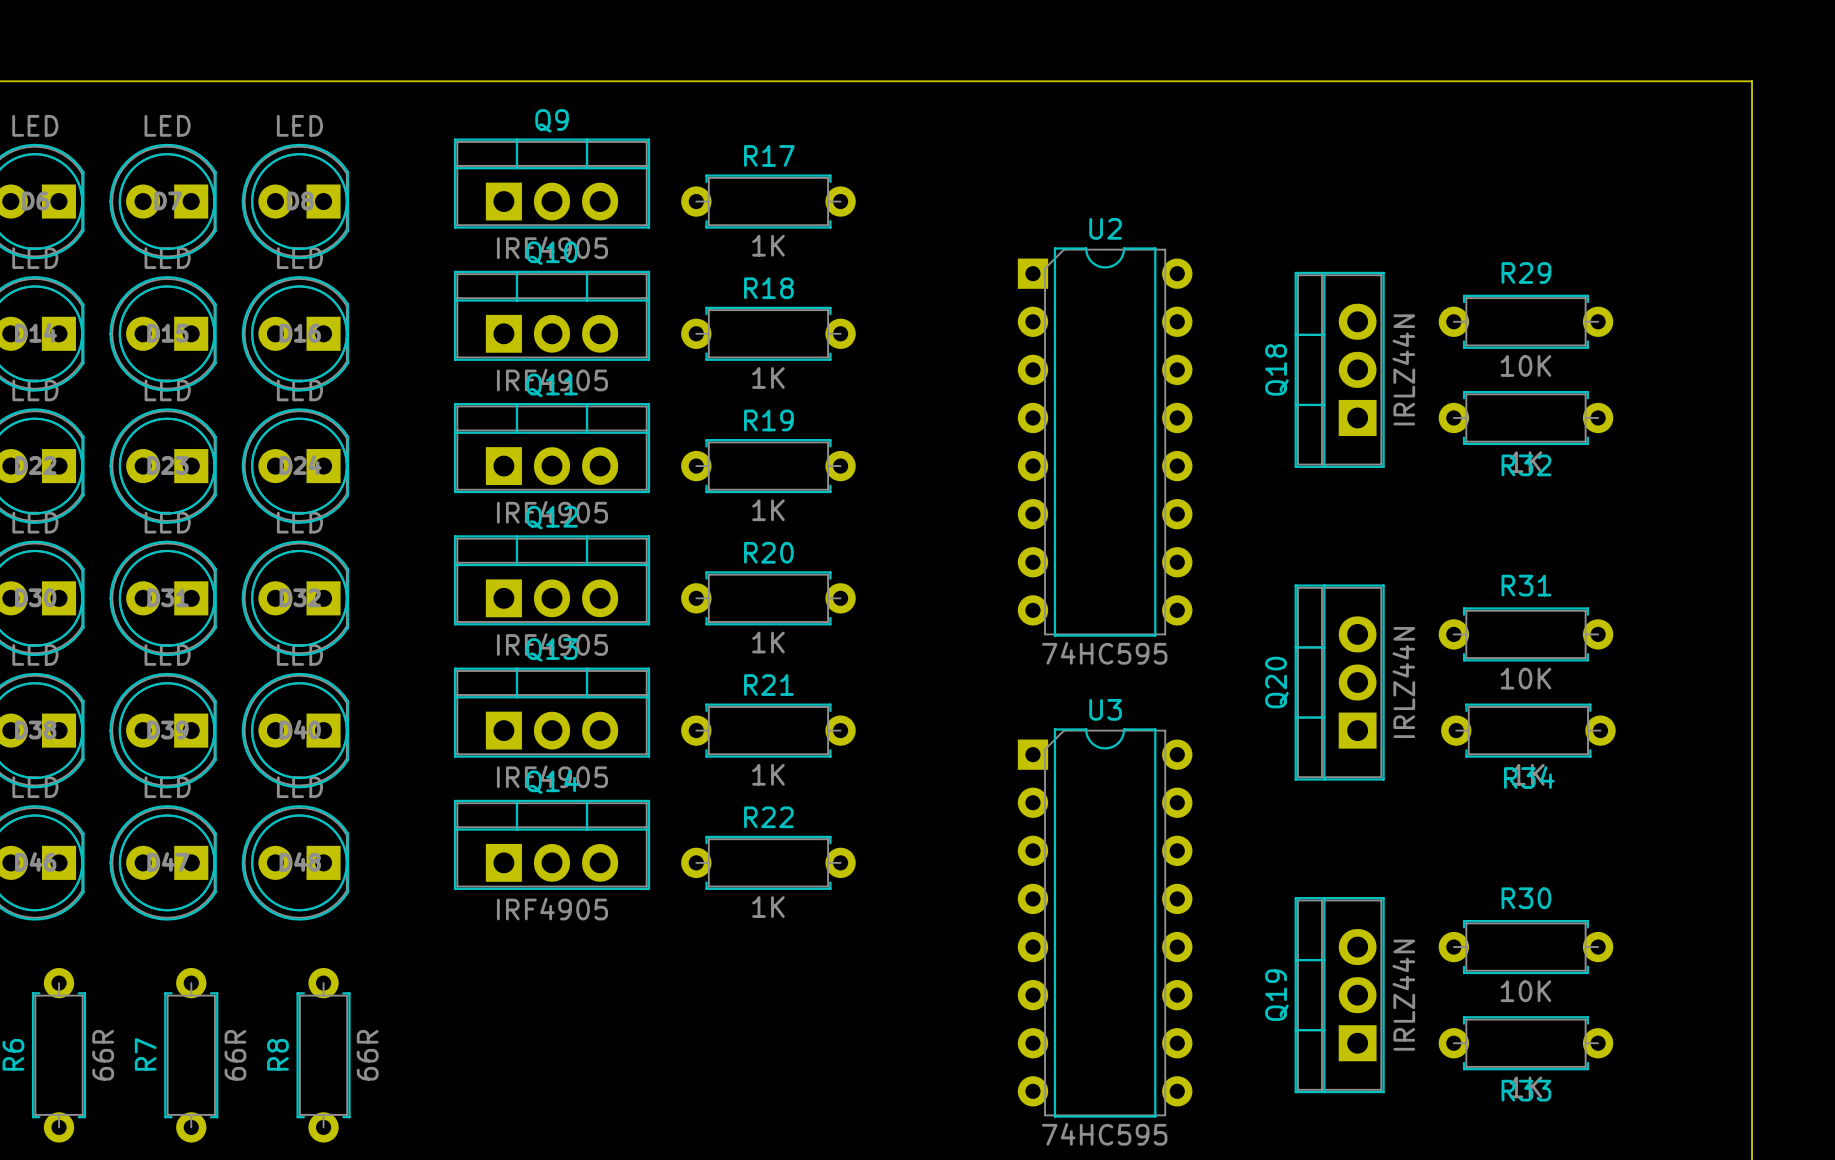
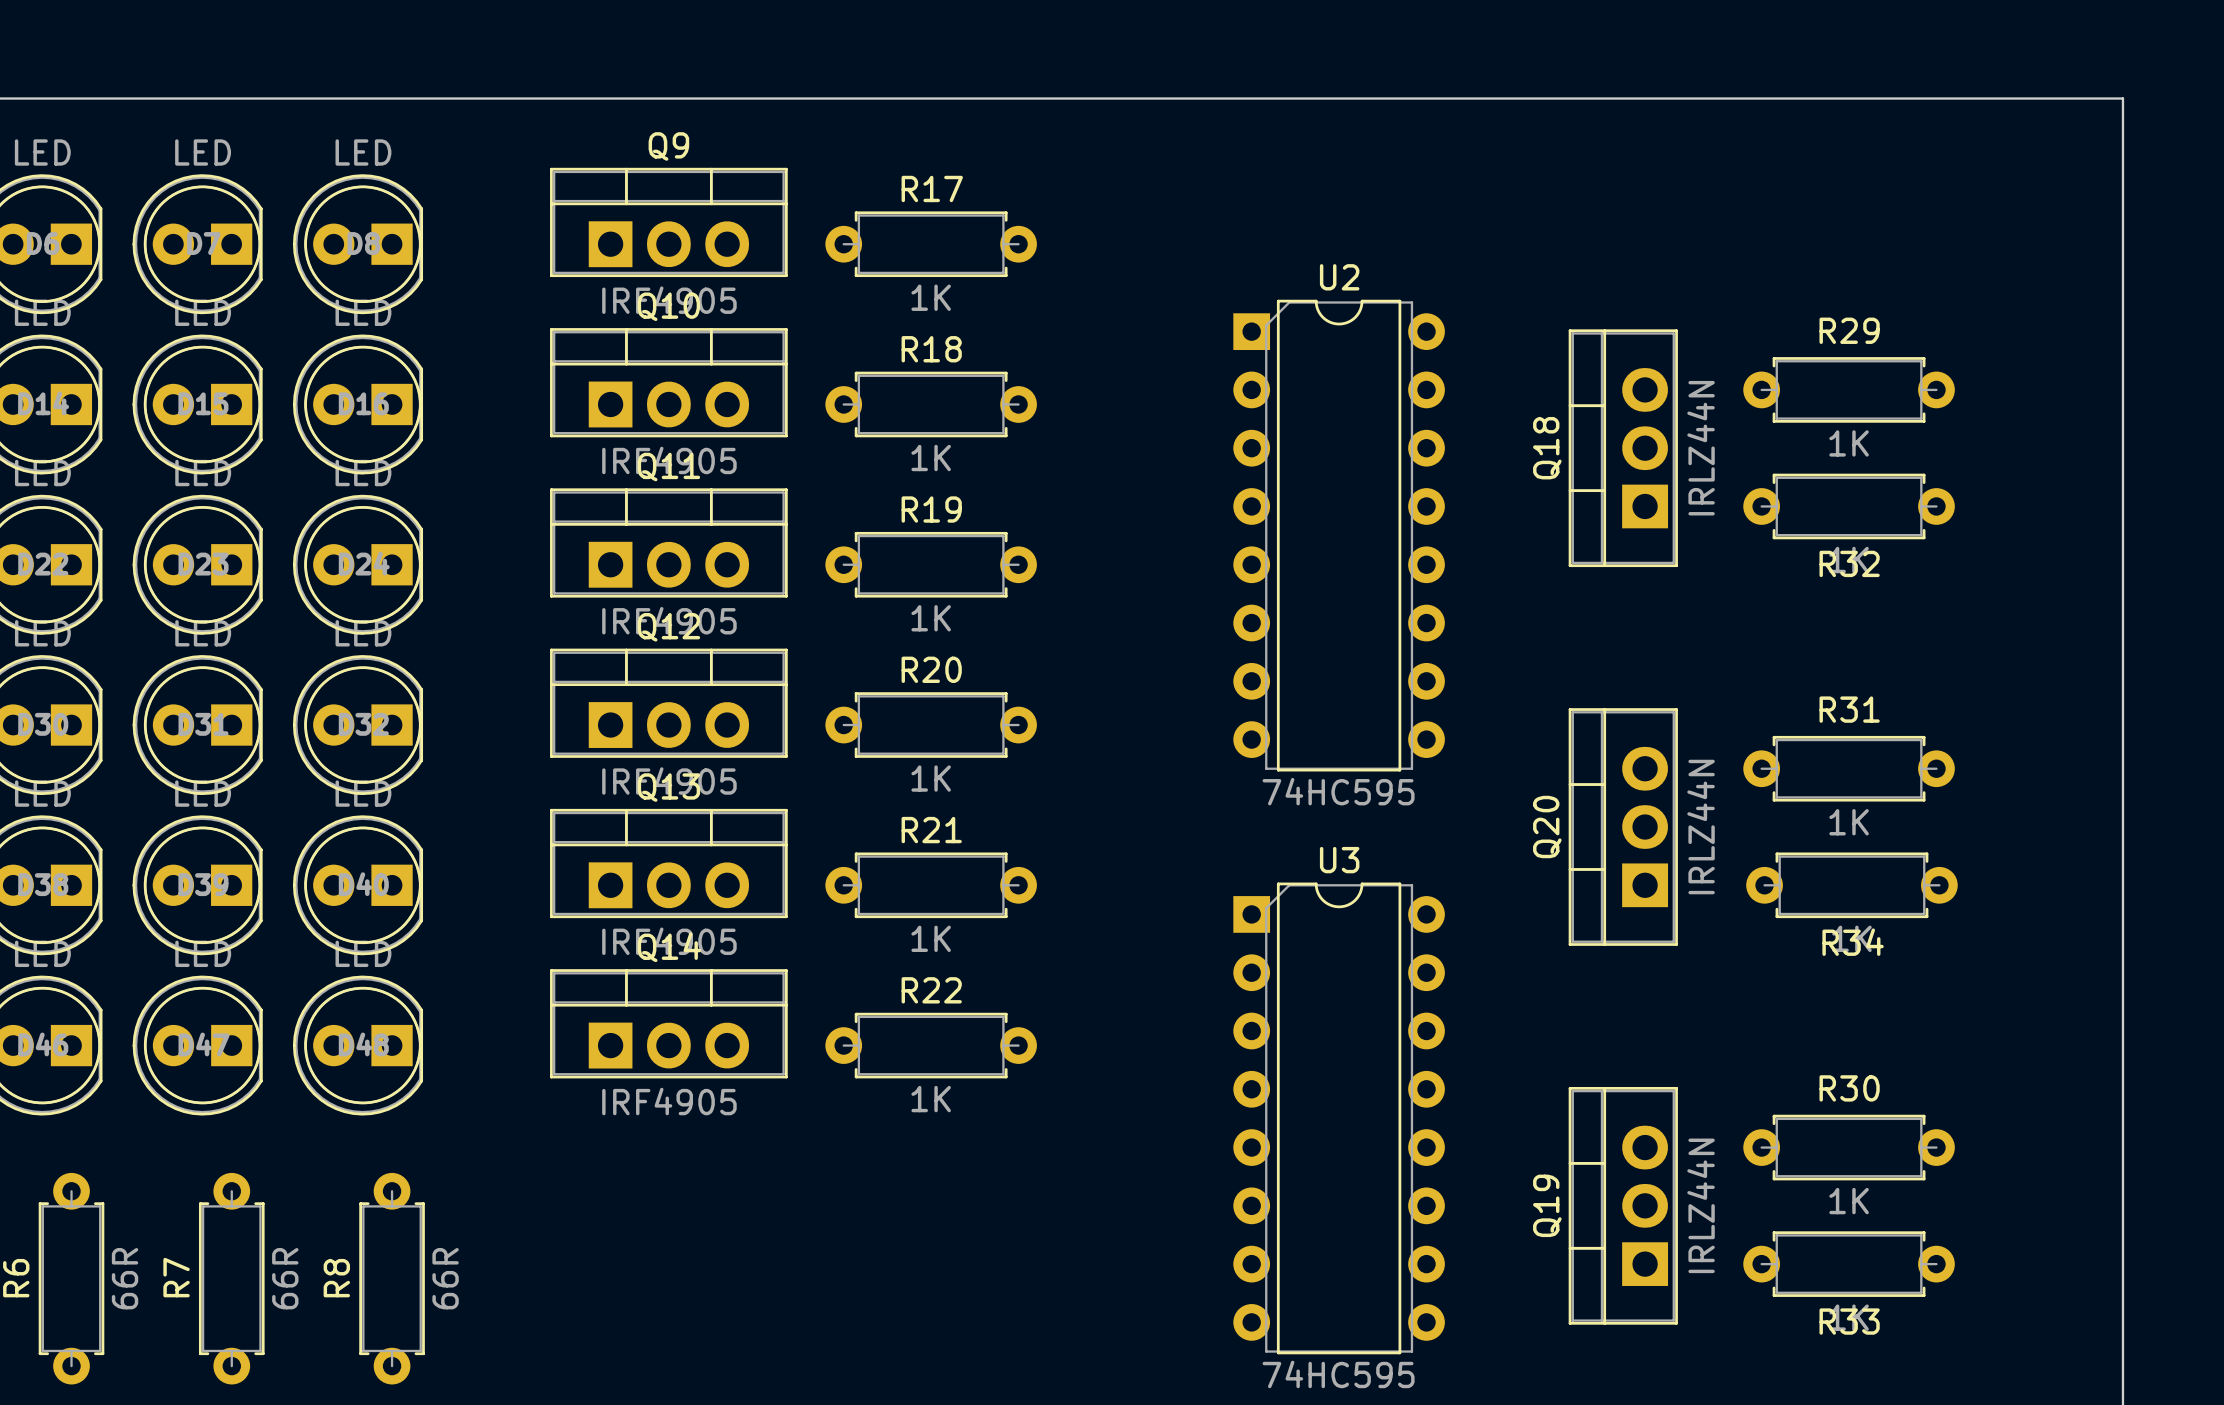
R29 value: 10K (1525, 365) -> 1K (1849, 443)
R31 value: 10K (1525, 678) -> 1K (1849, 822)
R30 value: 10K (1525, 991) -> 1K (1849, 1201)

